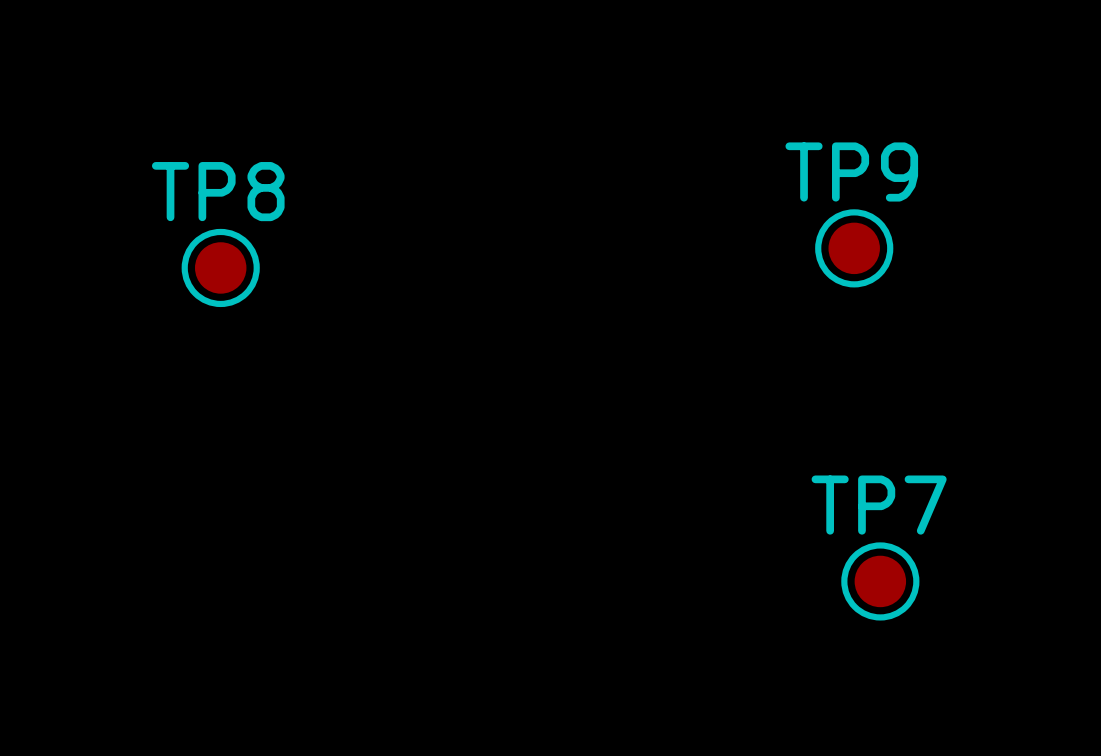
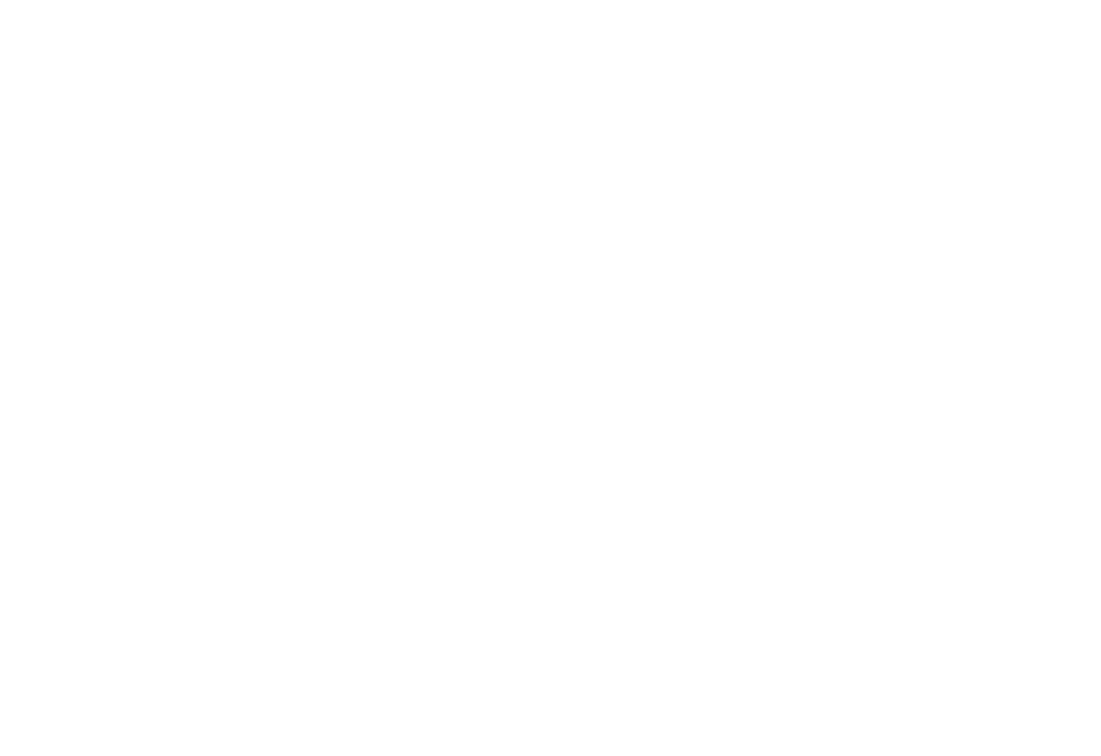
TP9: (854, 248) -> none
TP8: (220, 267) -> none
TP7: (880, 581) -> none

